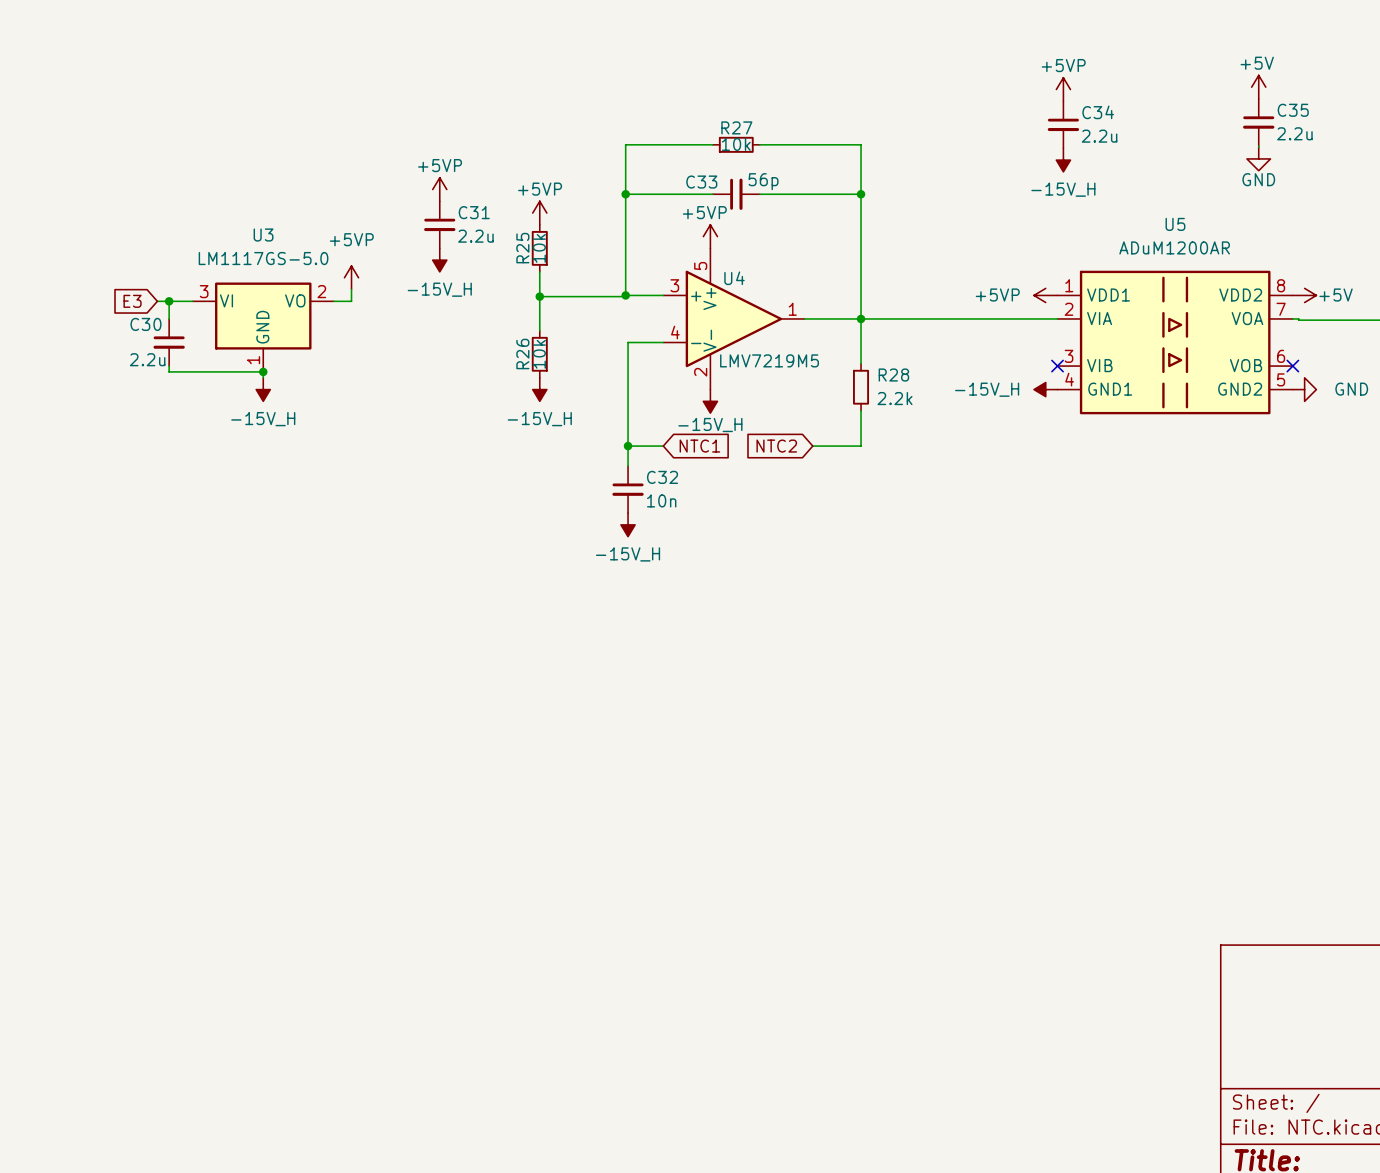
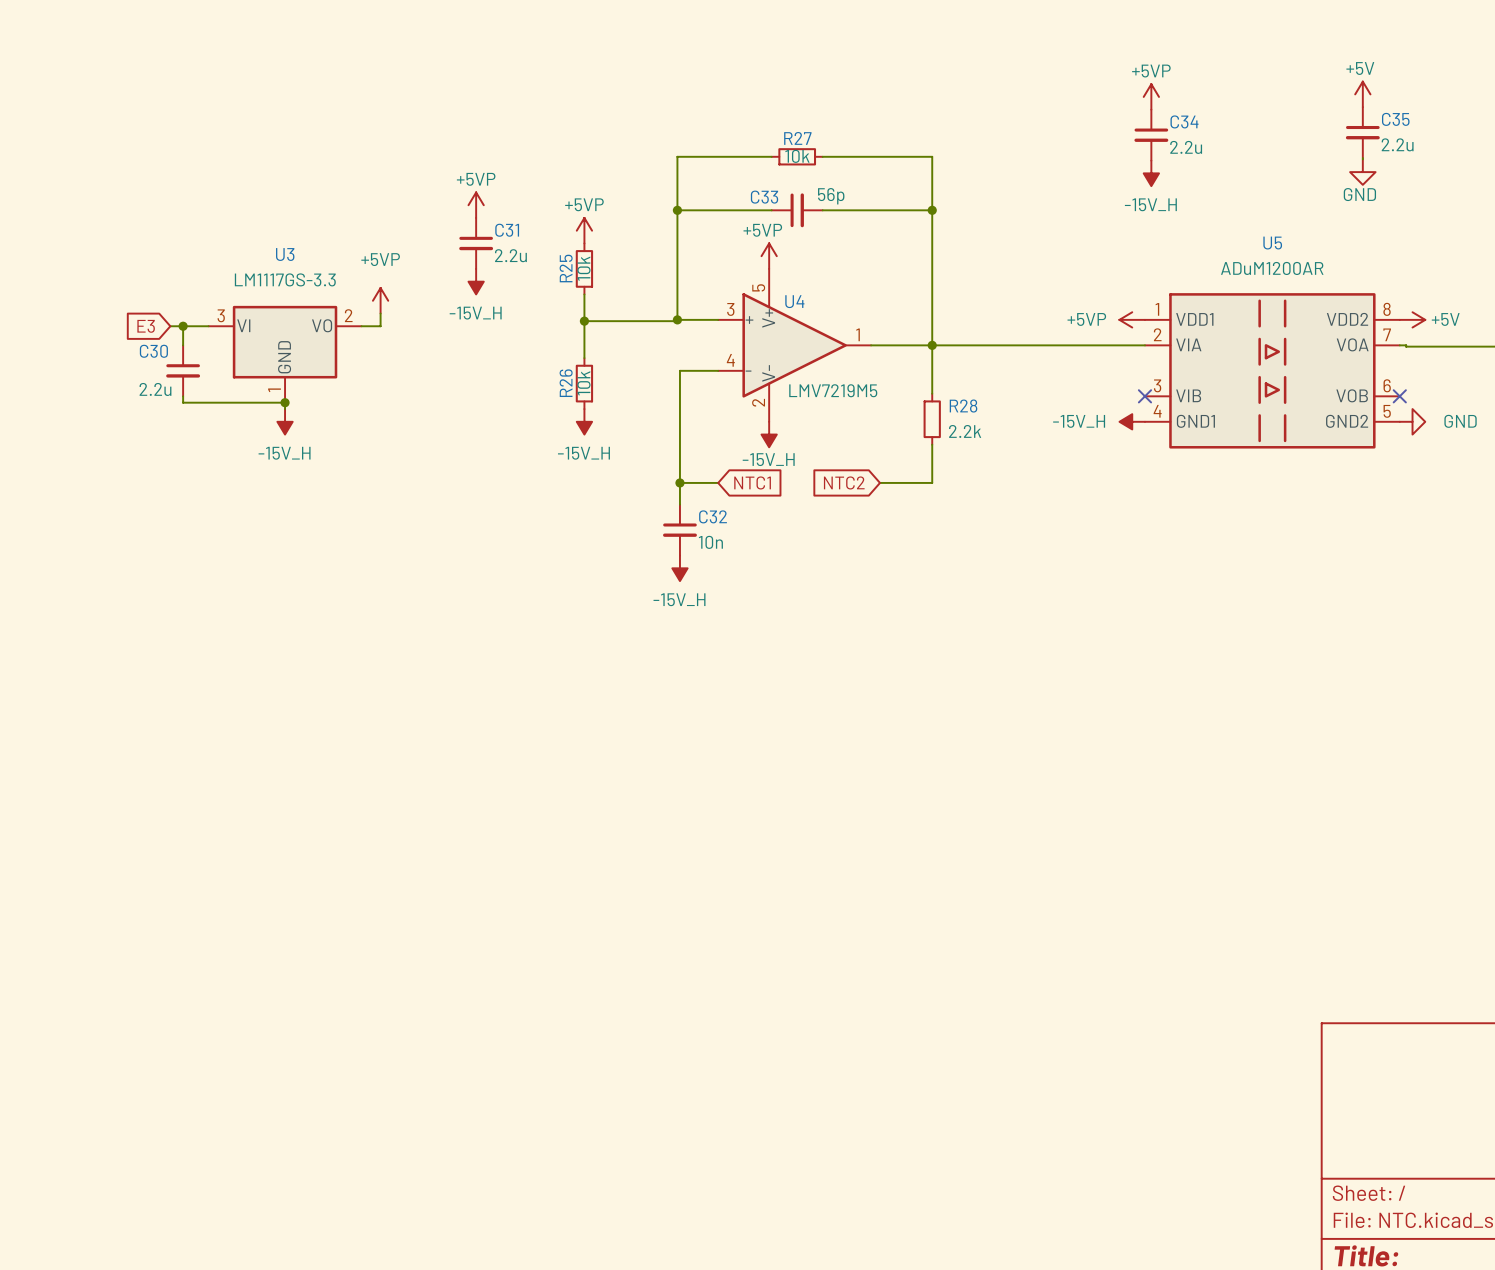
U3 value: LM1117GS-5.0 (263, 258) -> LM1117GS-3.3 (285, 279)

